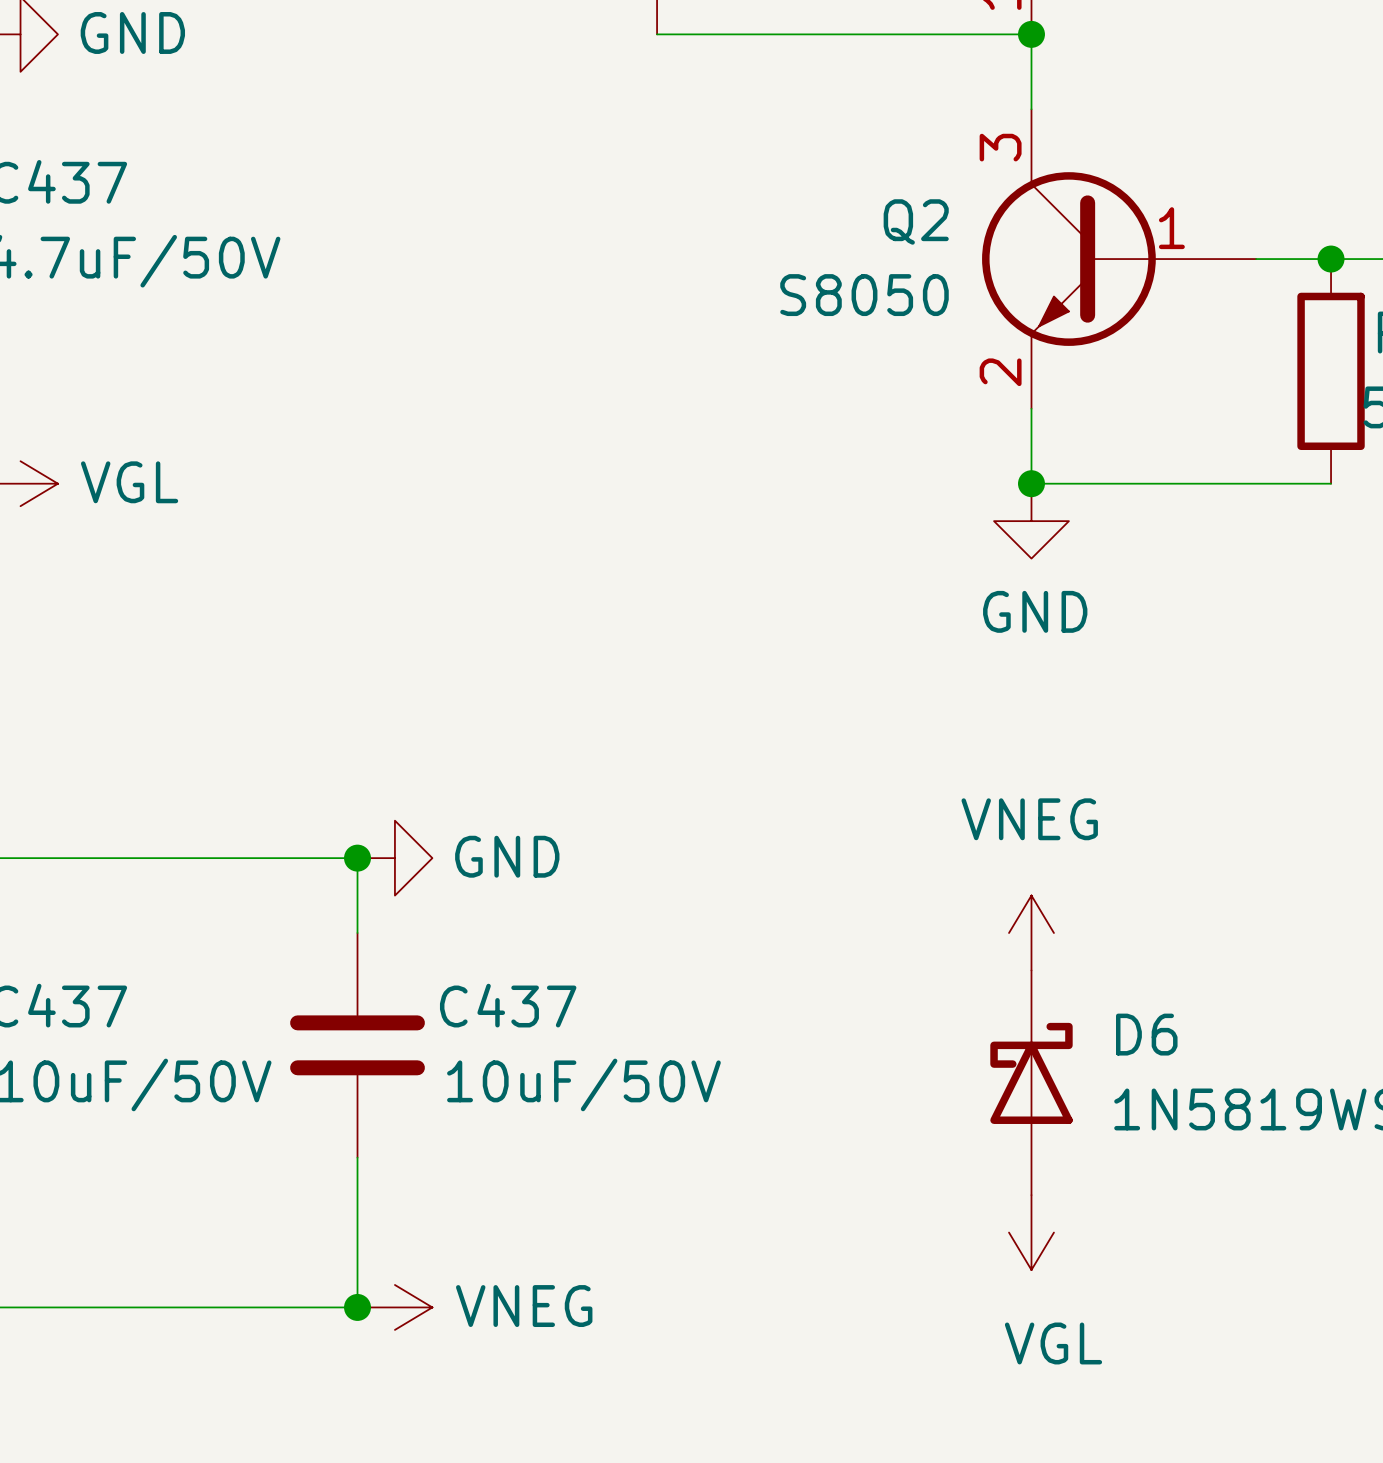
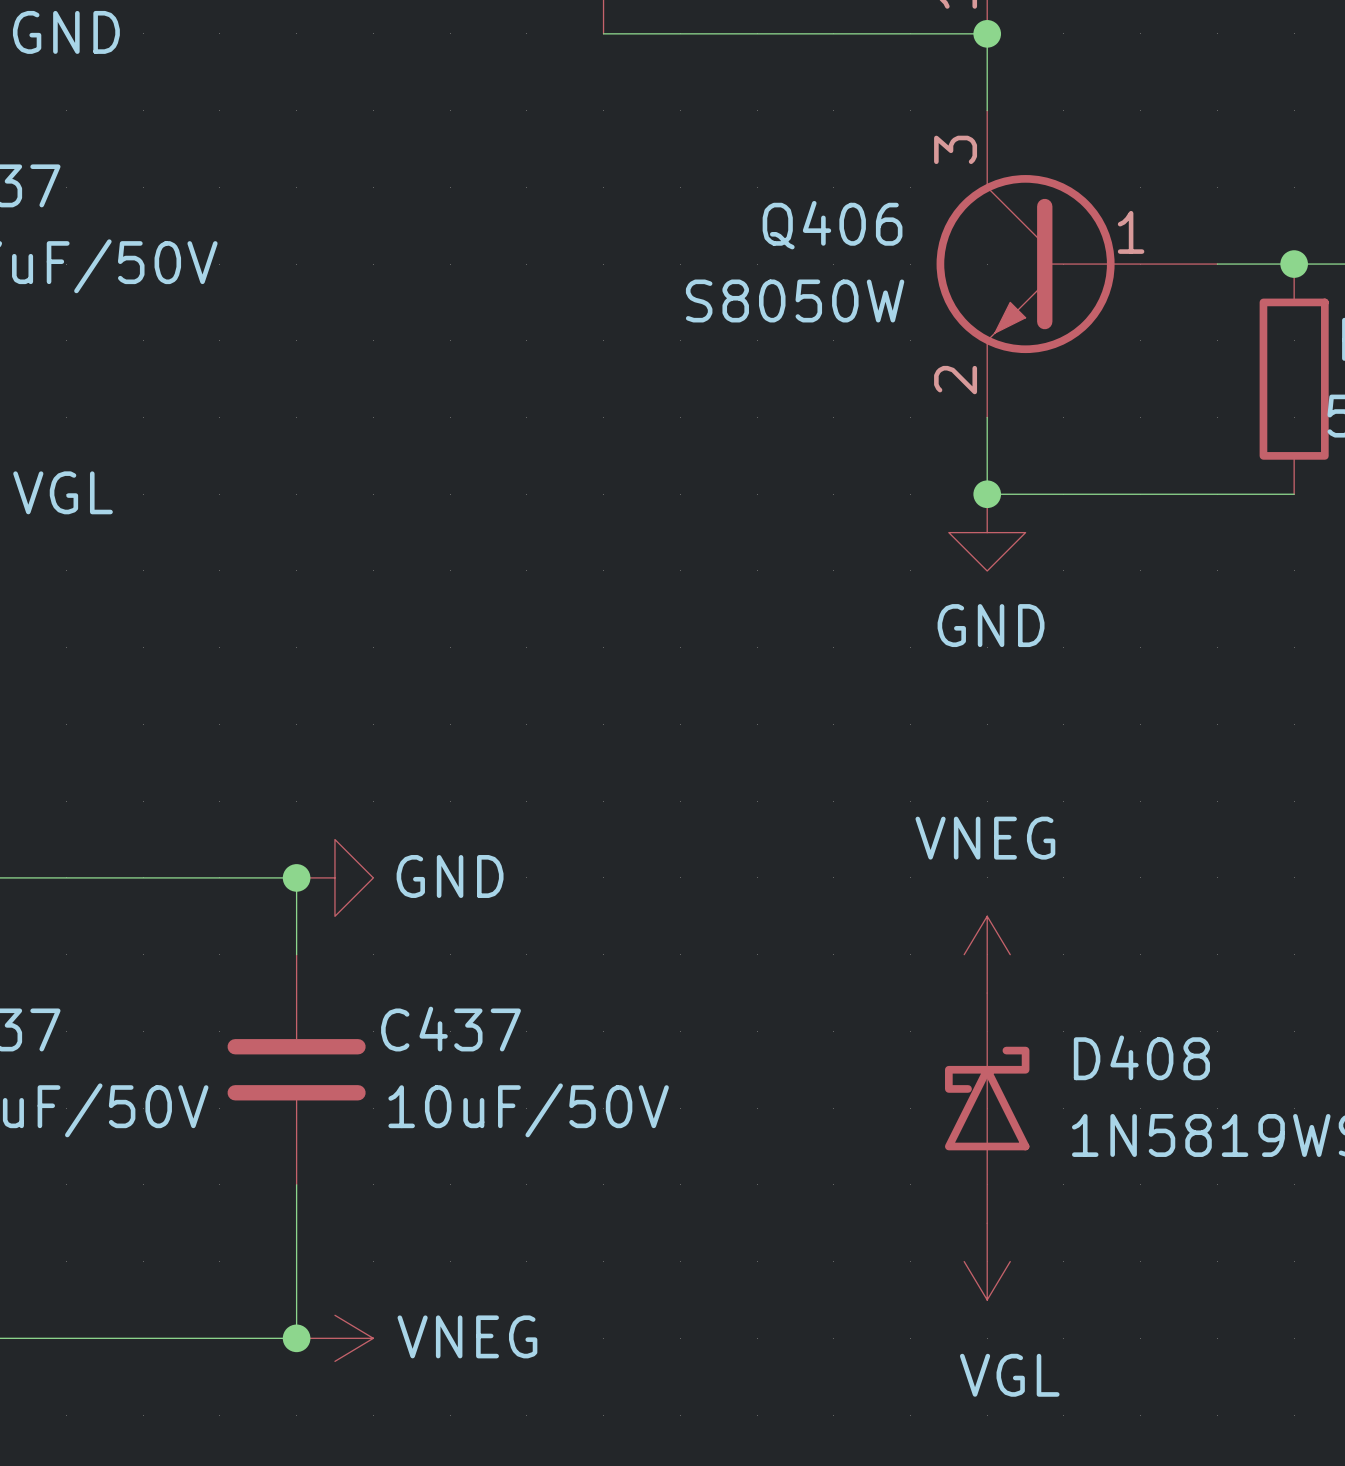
Q2 name: Q2 (916, 221) -> Q406 (832, 225)
Q2 value: S8050 (864, 295) -> S8050W (795, 300)
D6 name: D6 (1146, 1034) -> D408 (1141, 1057)

